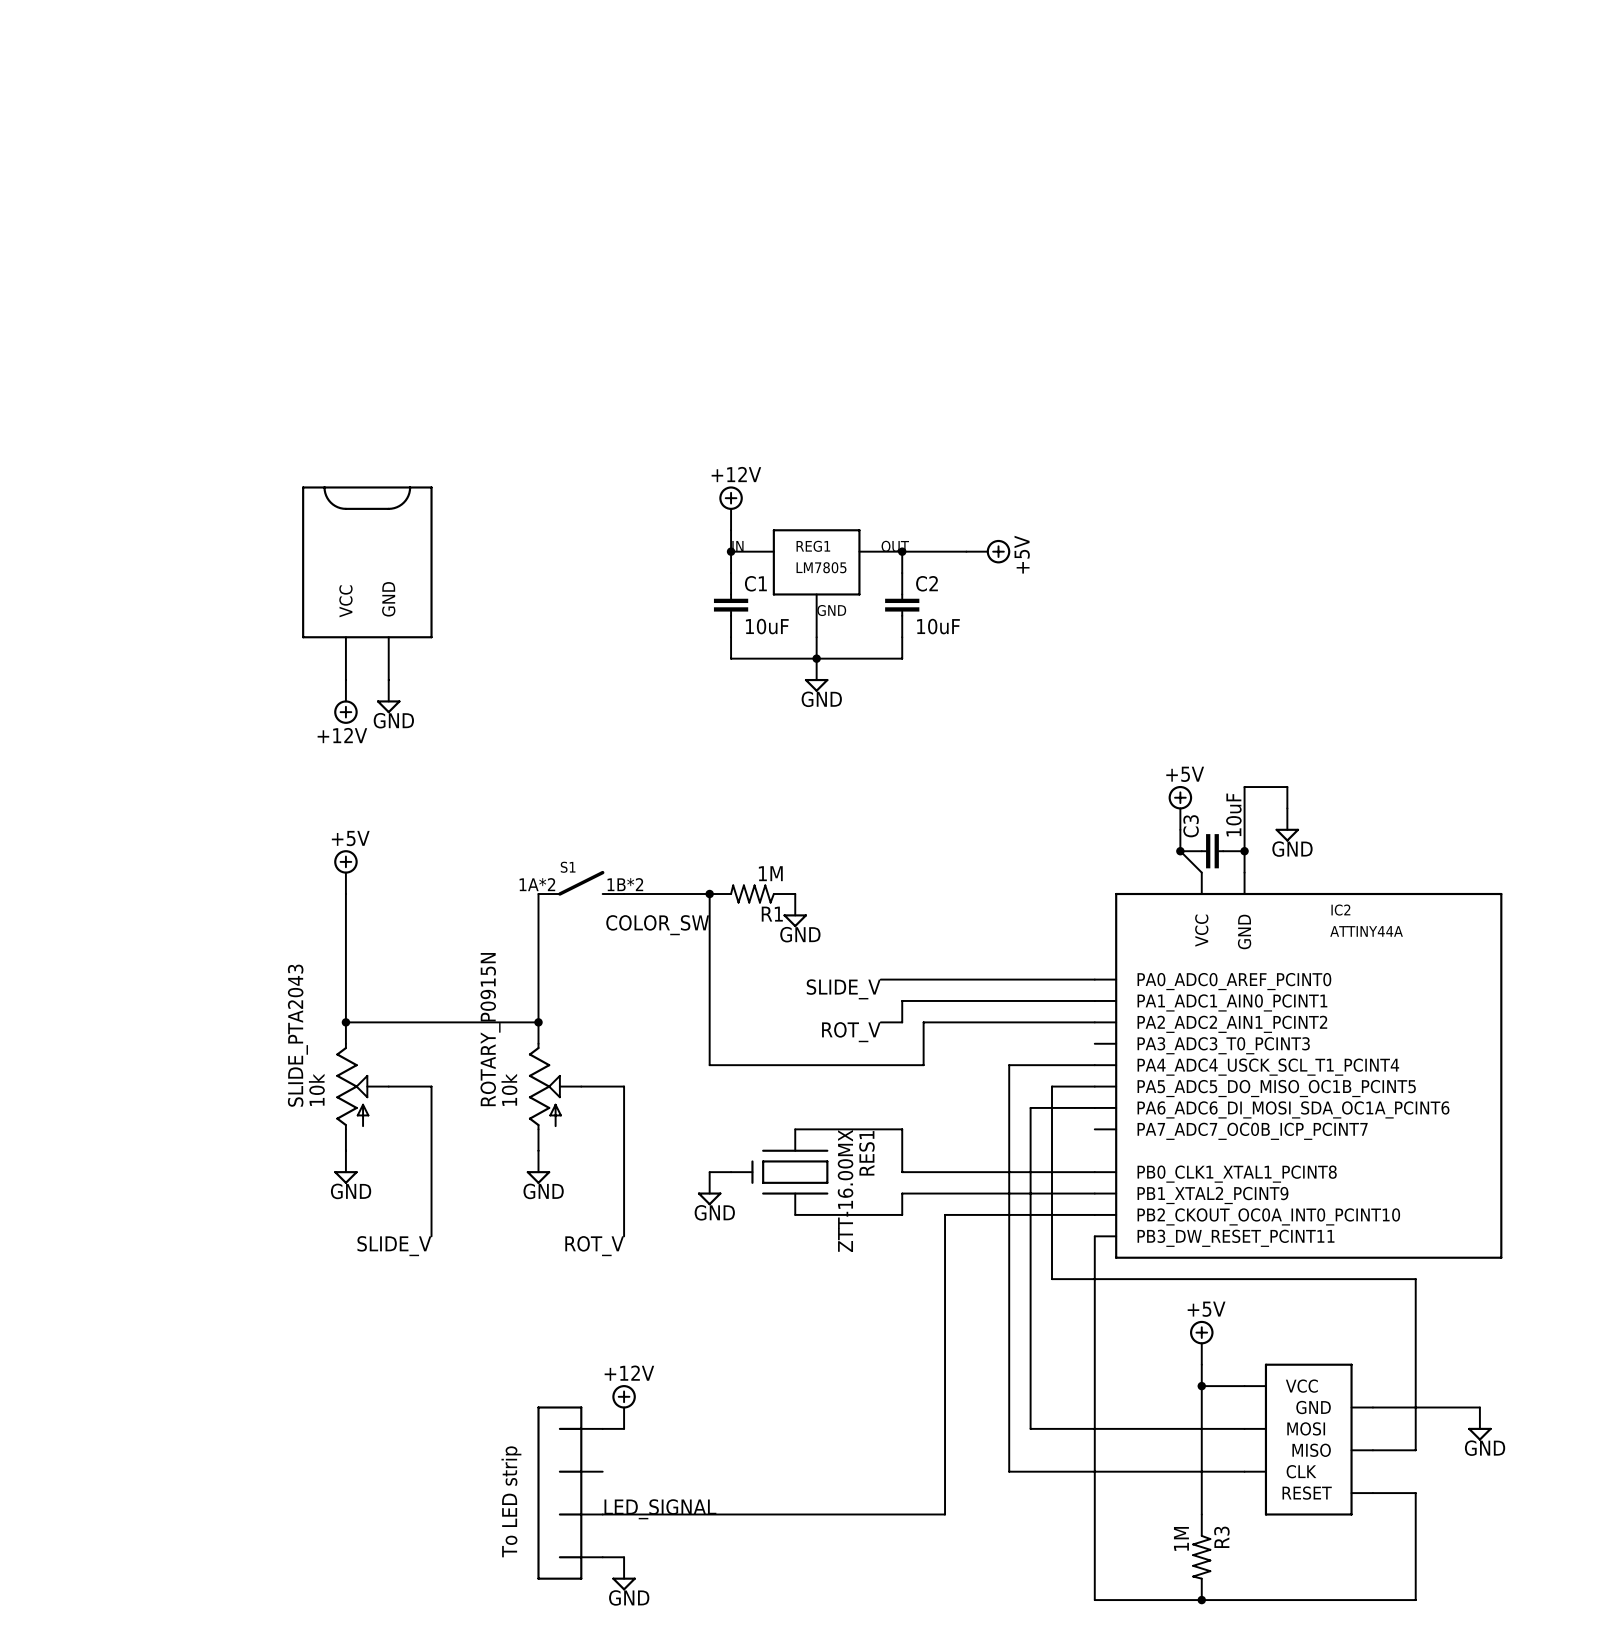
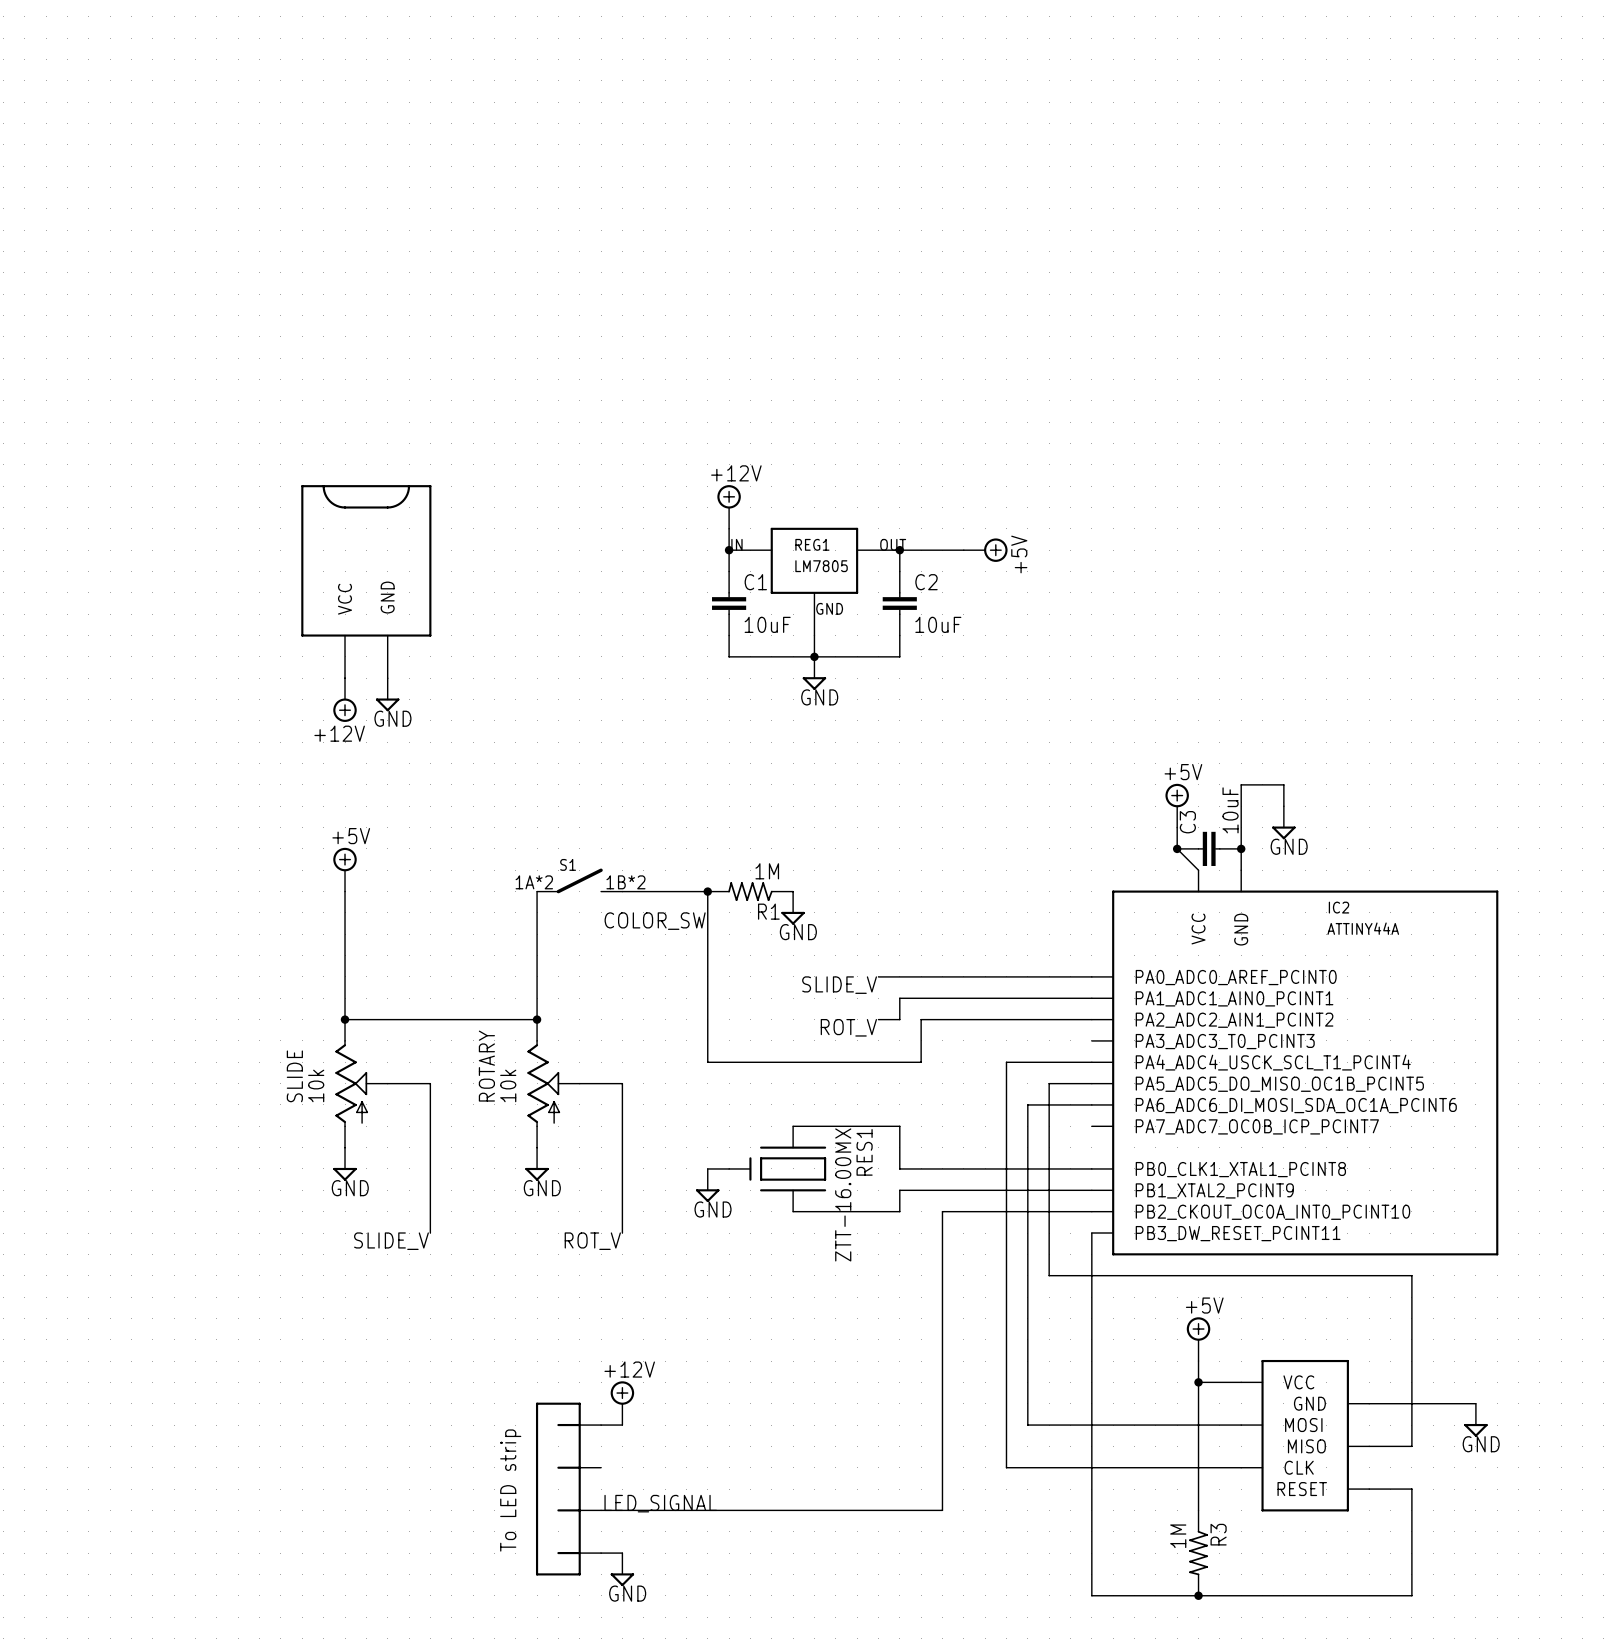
ROTARY_P0915N name: ROTARY_P0915N (490, 1029) -> ROTARY (486, 1066)
SLIDE_PTA2043 name: SLIDE_PTA2043 (297, 1035) -> SLIDE (294, 1076)

